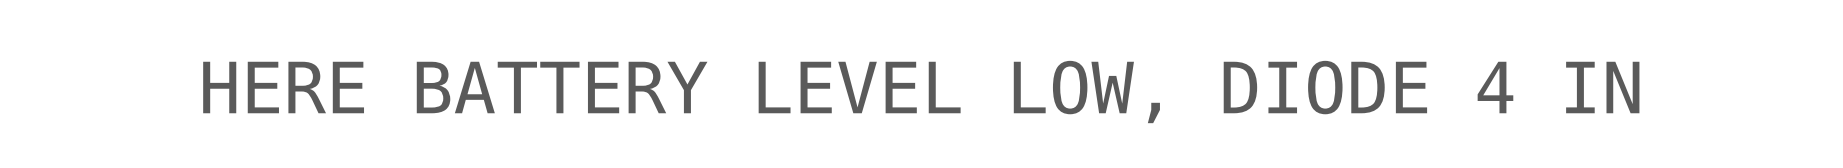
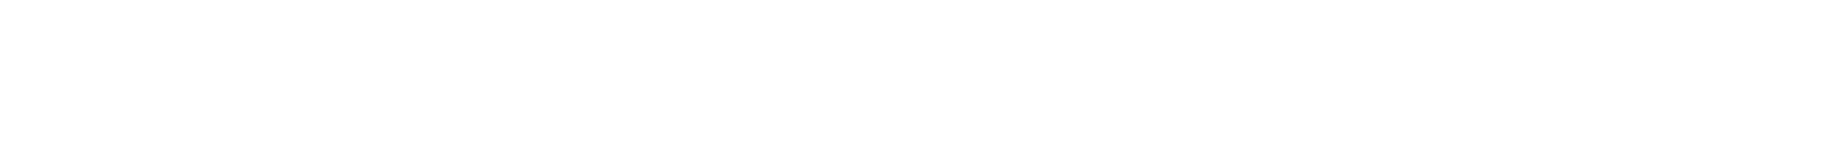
text: HERE BATTERY LEVEL LOW, DIODE 4 IN (921, 92) -> none

